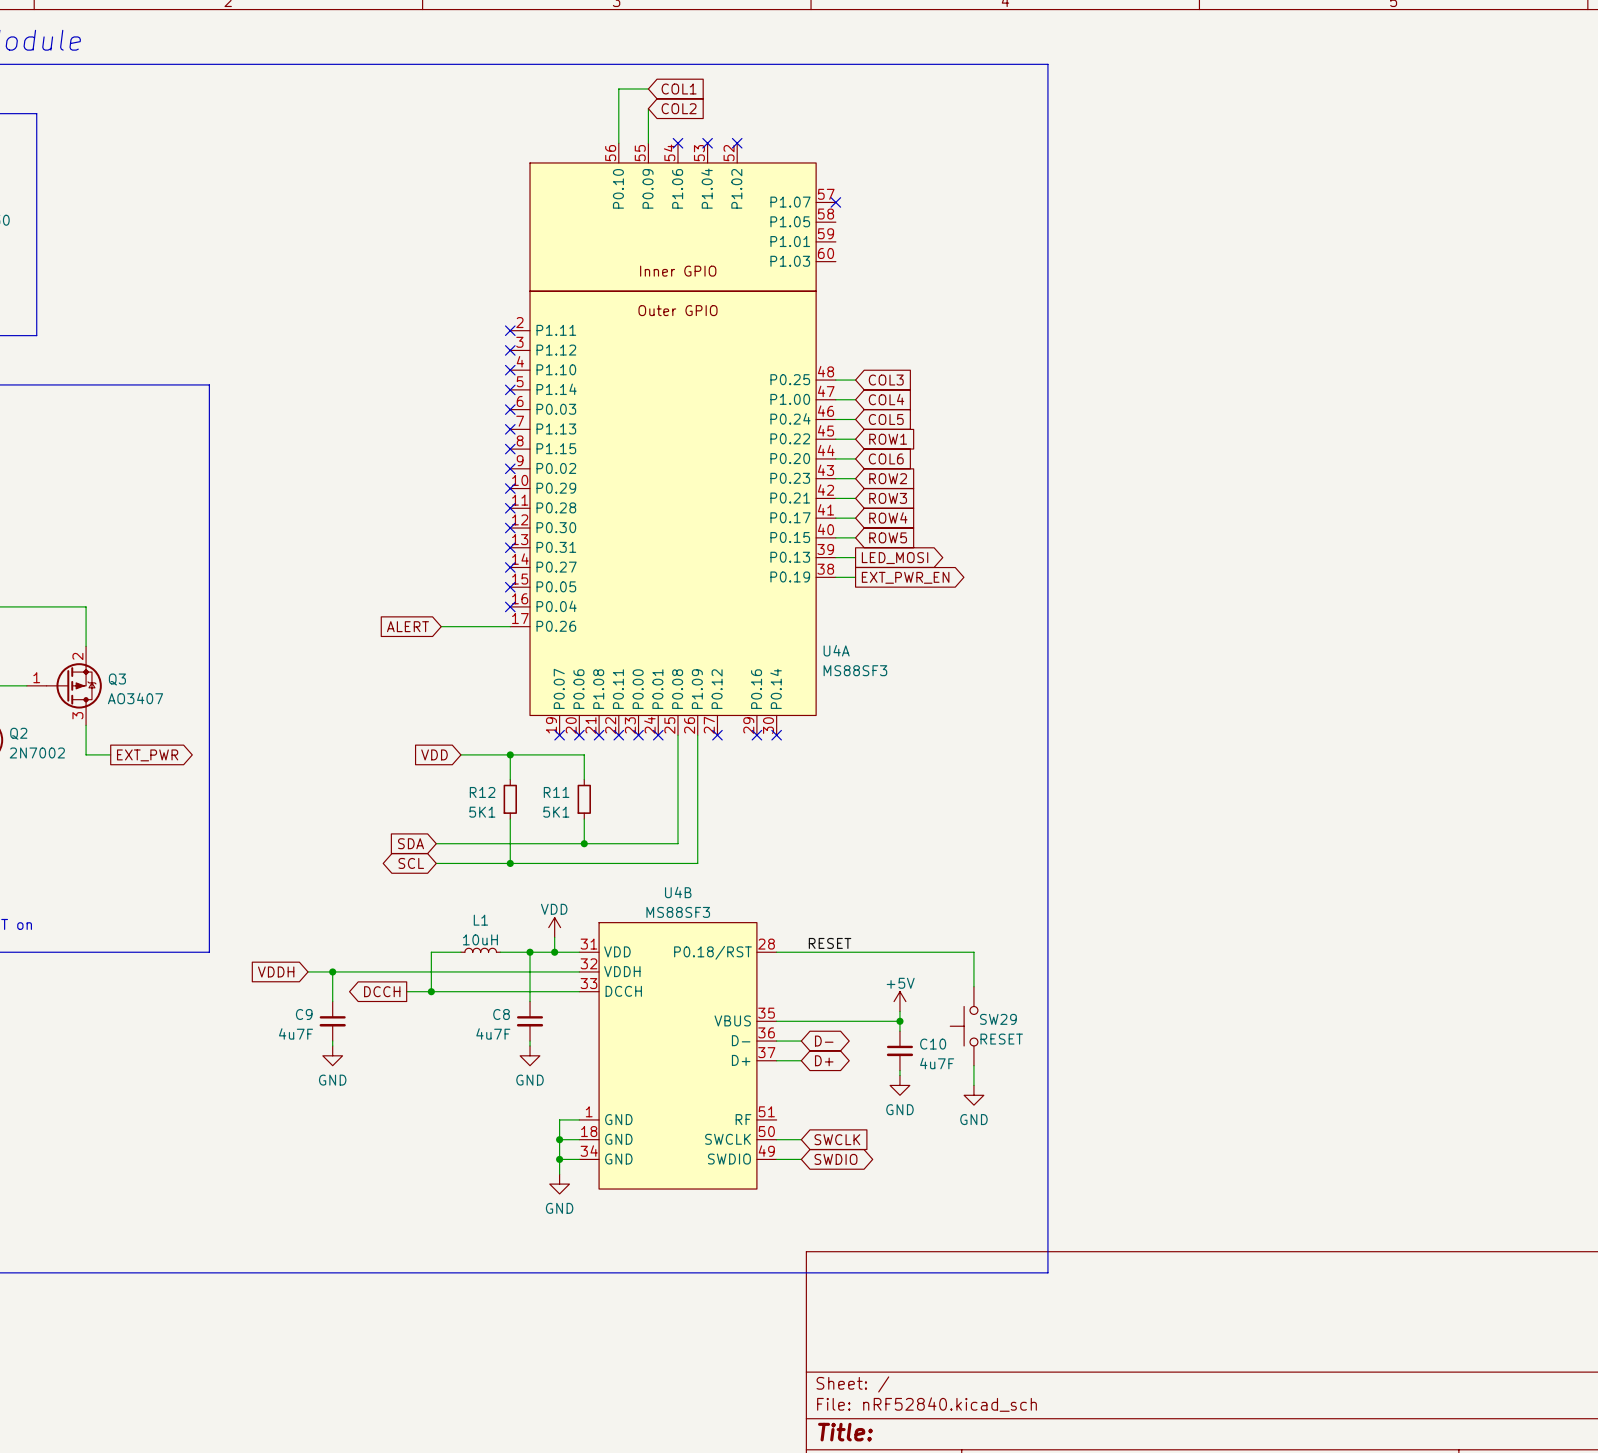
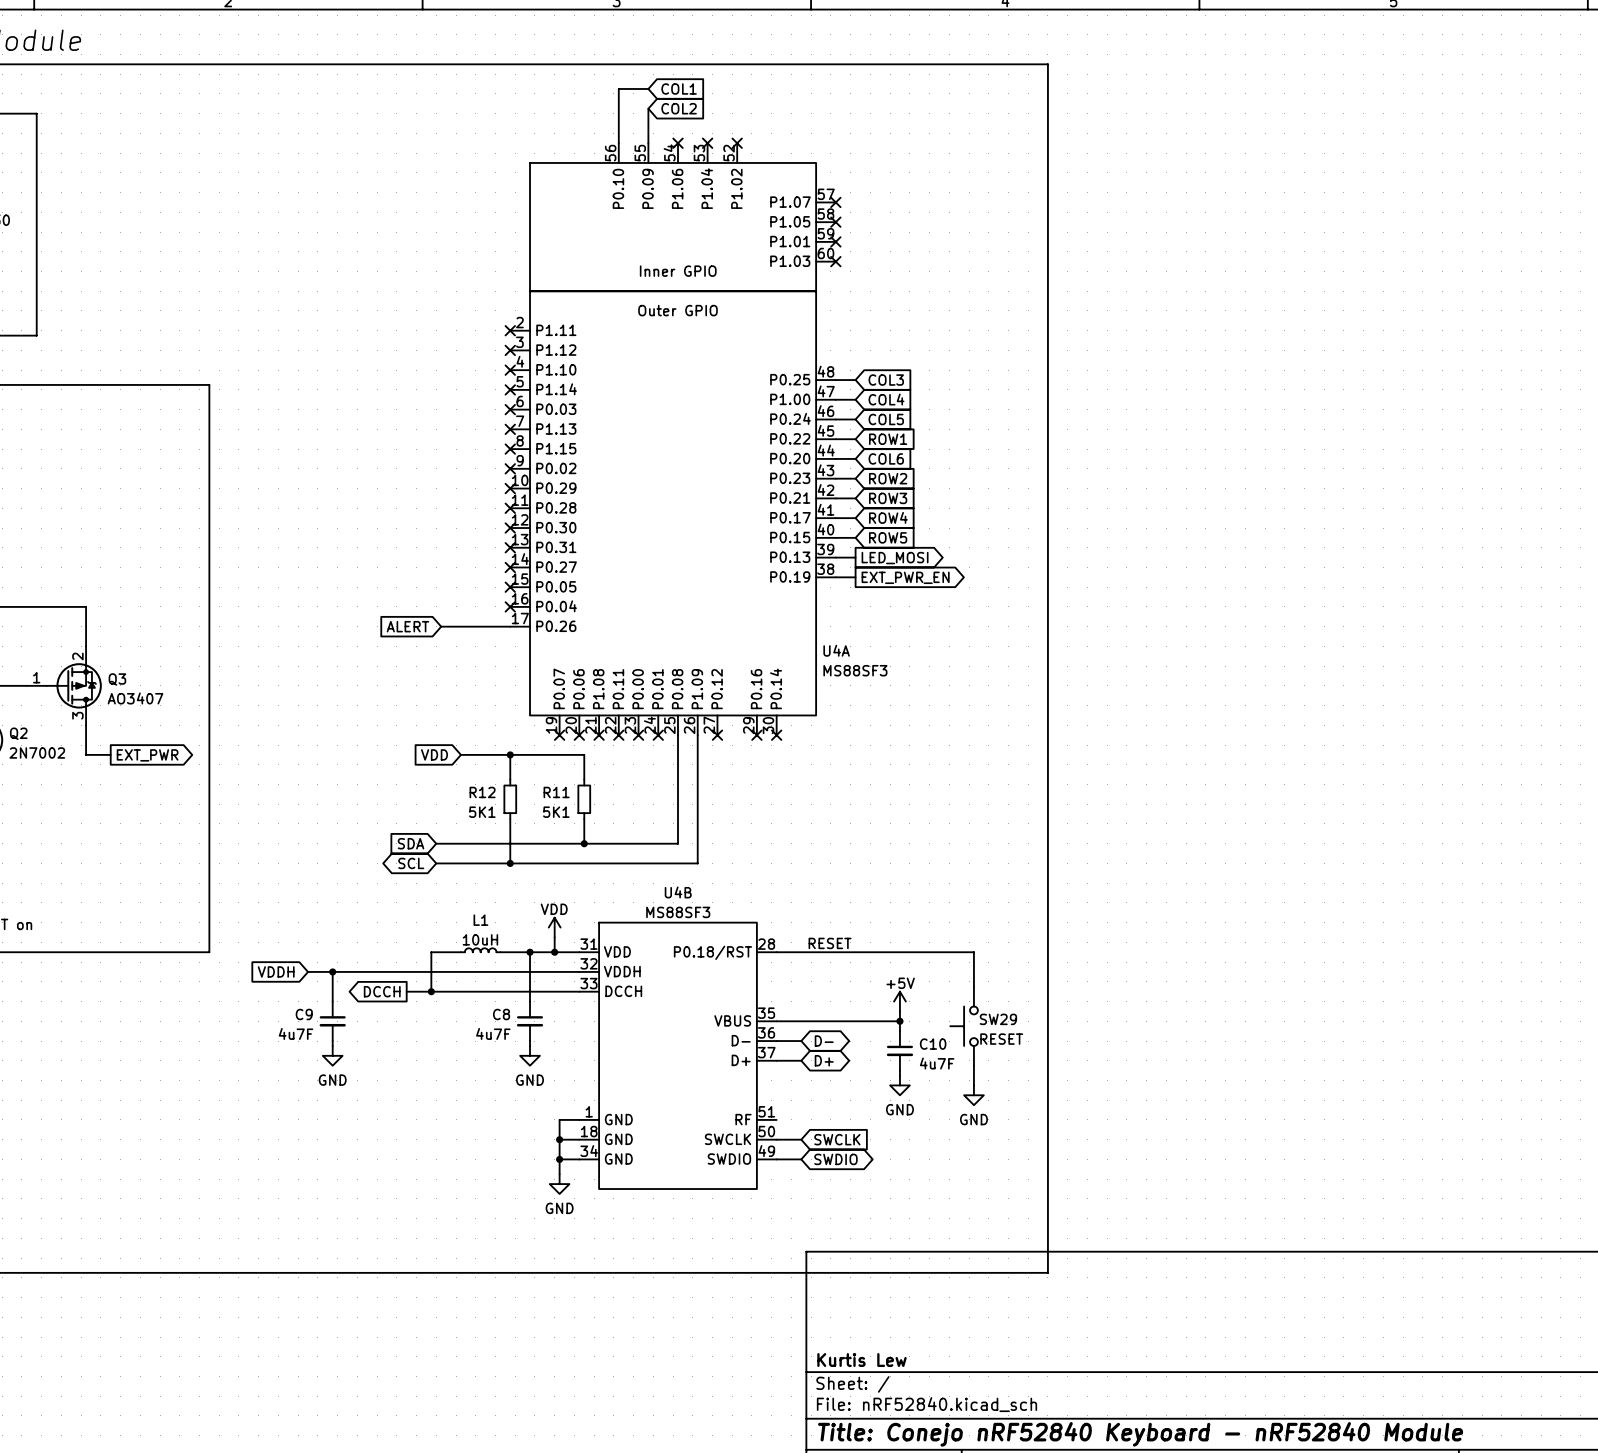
no-connect mark: none -> (835, 222)
no-connect mark: none -> (835, 241)
no-connect mark: none -> (835, 261)
title block: none -> Kurtis Lew (862, 1360)
title block: Title: (845, 1432) -> Title: Conejo nRF52840 Keyboard - nRF52840 Module (1140, 1434)

